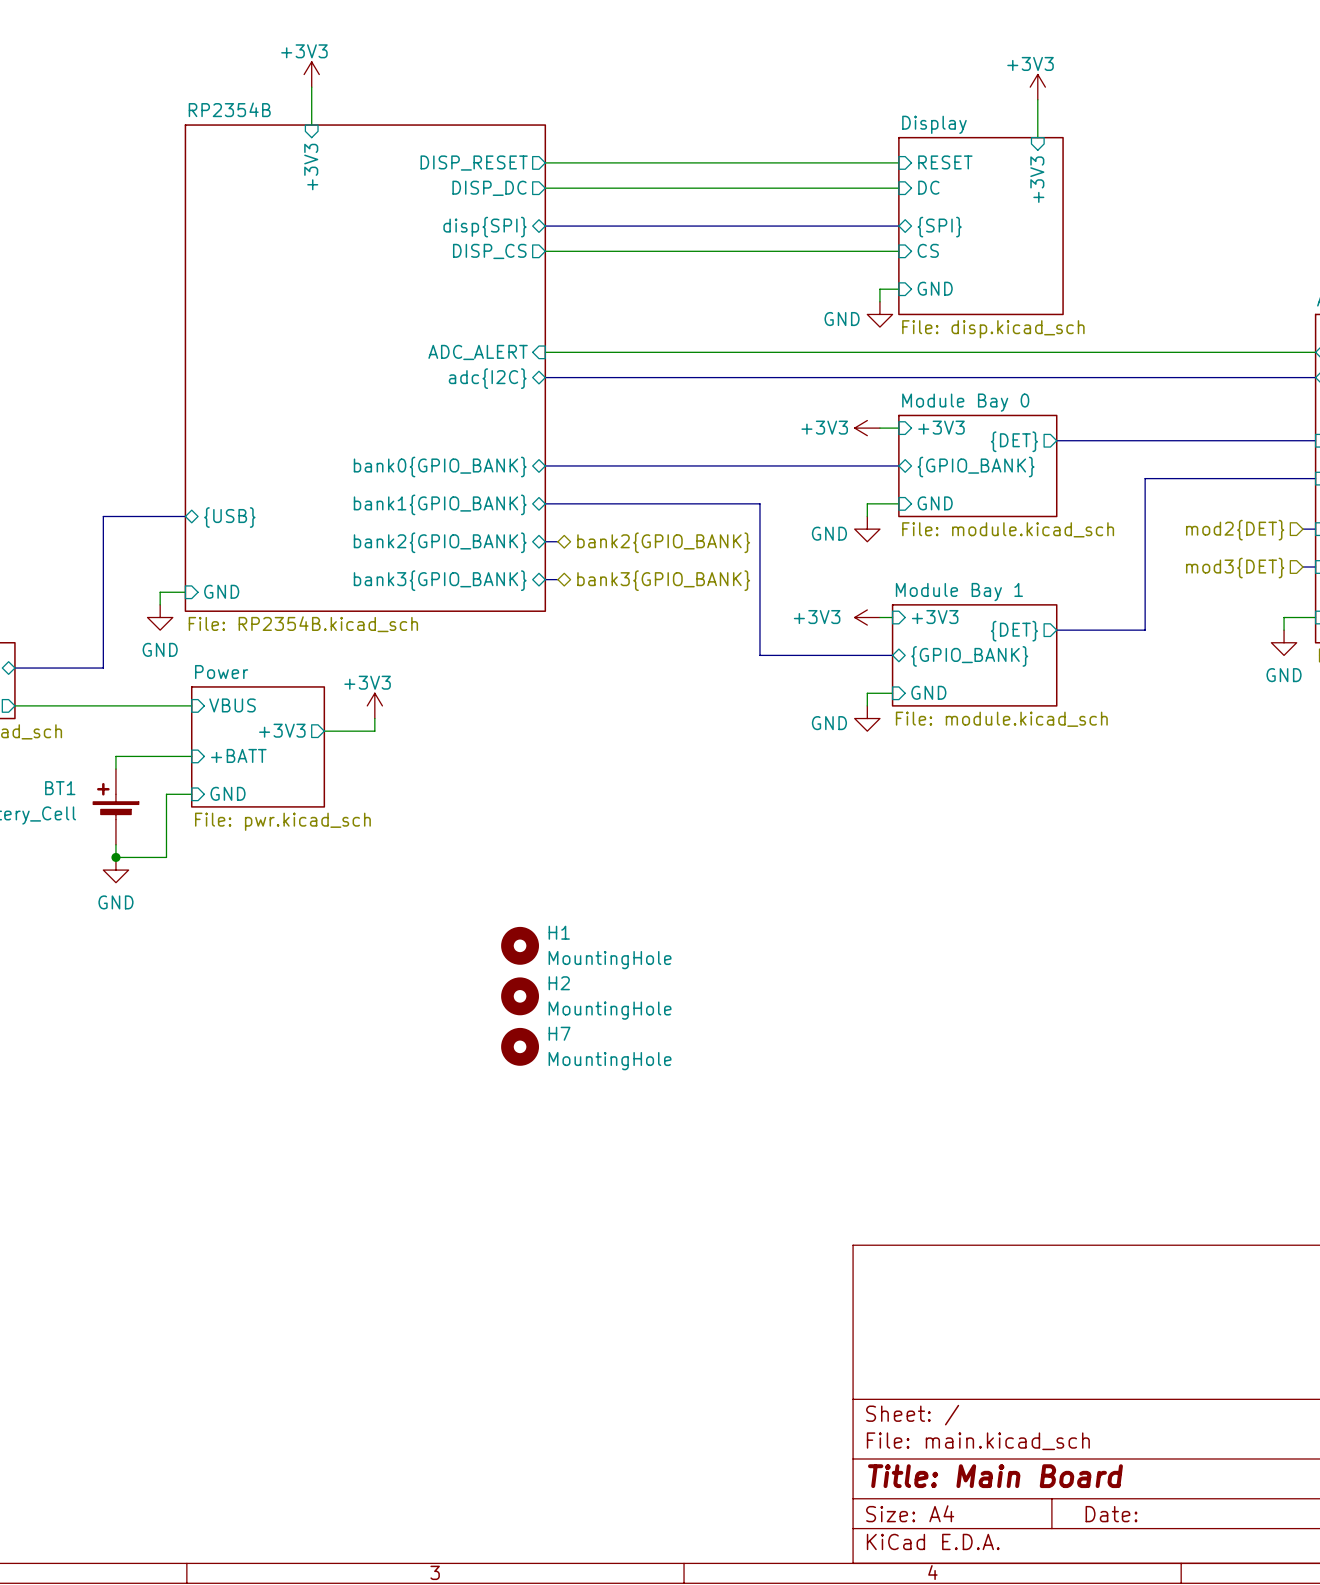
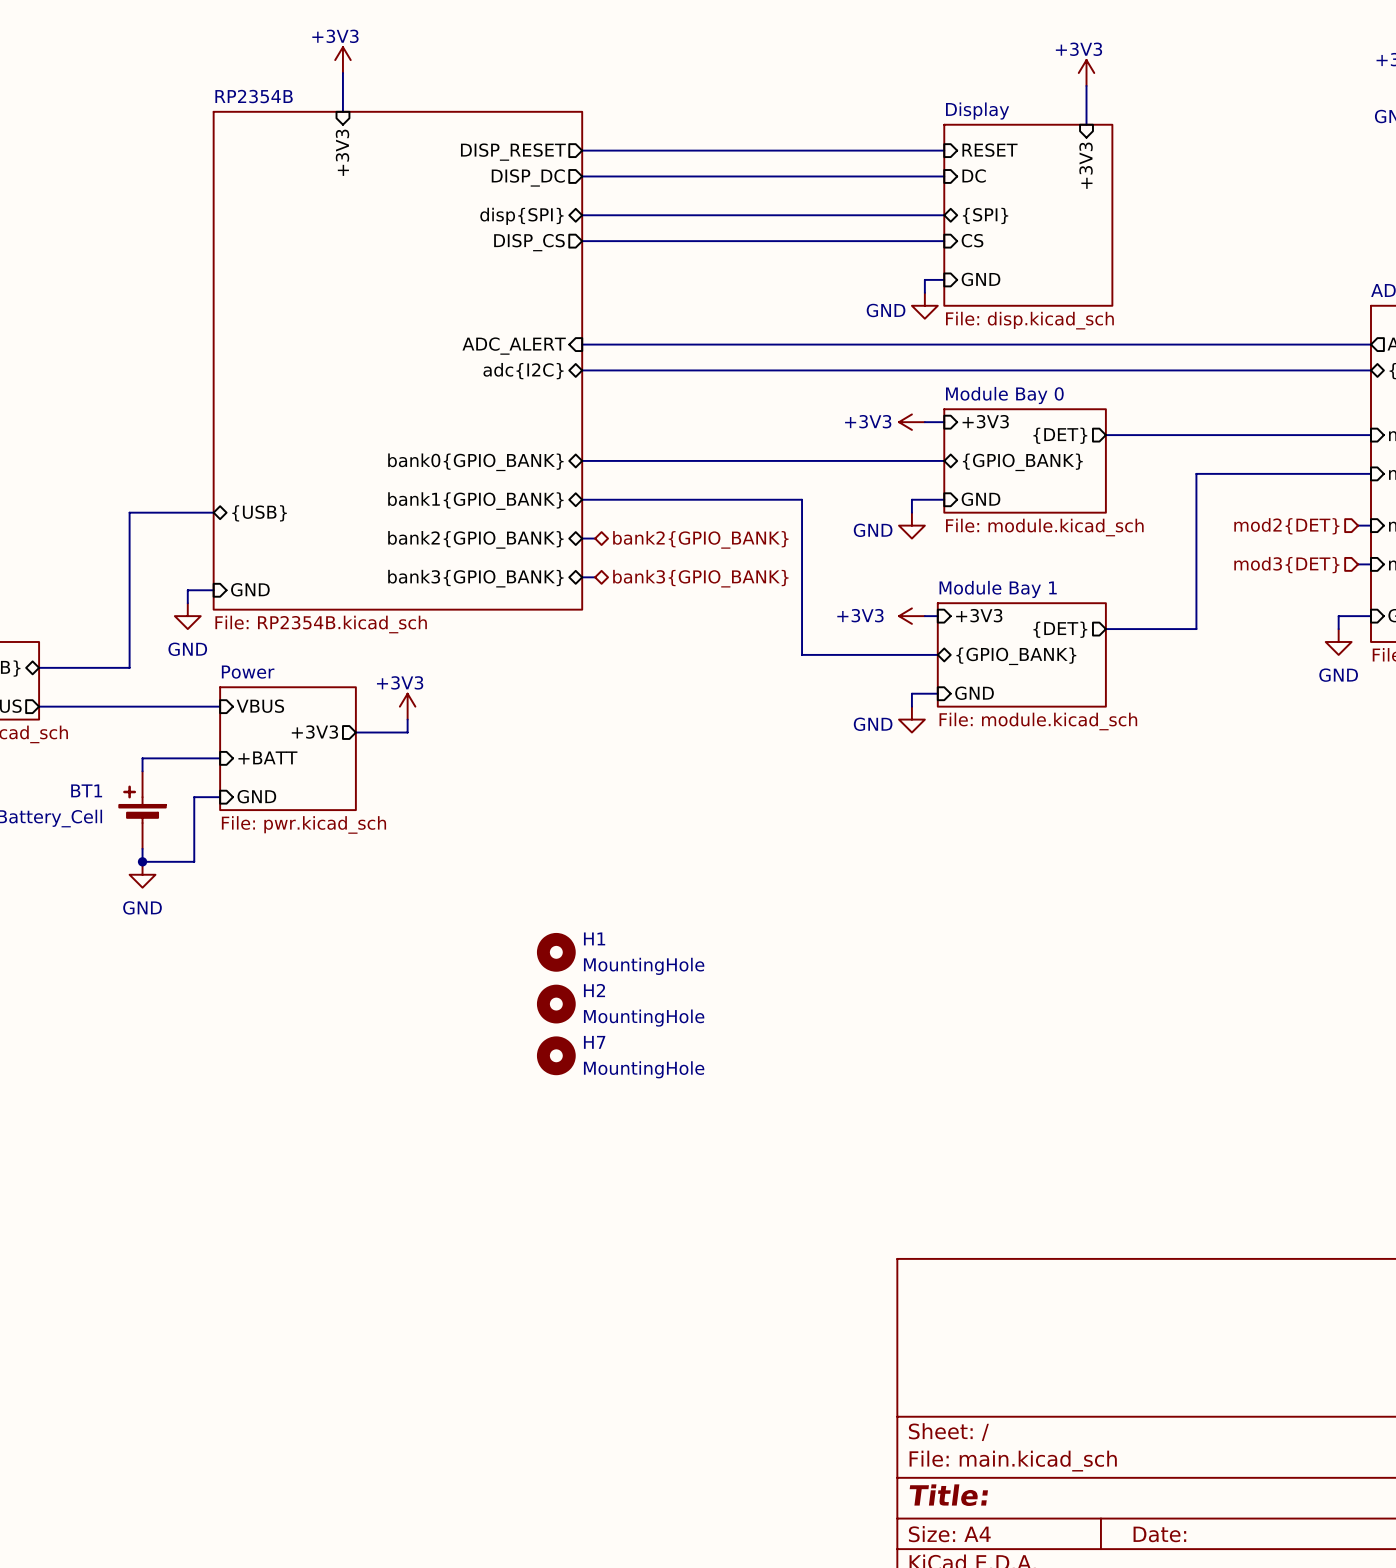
title block: Title: Main Board (995, 1476) -> Title: (948, 1495)

